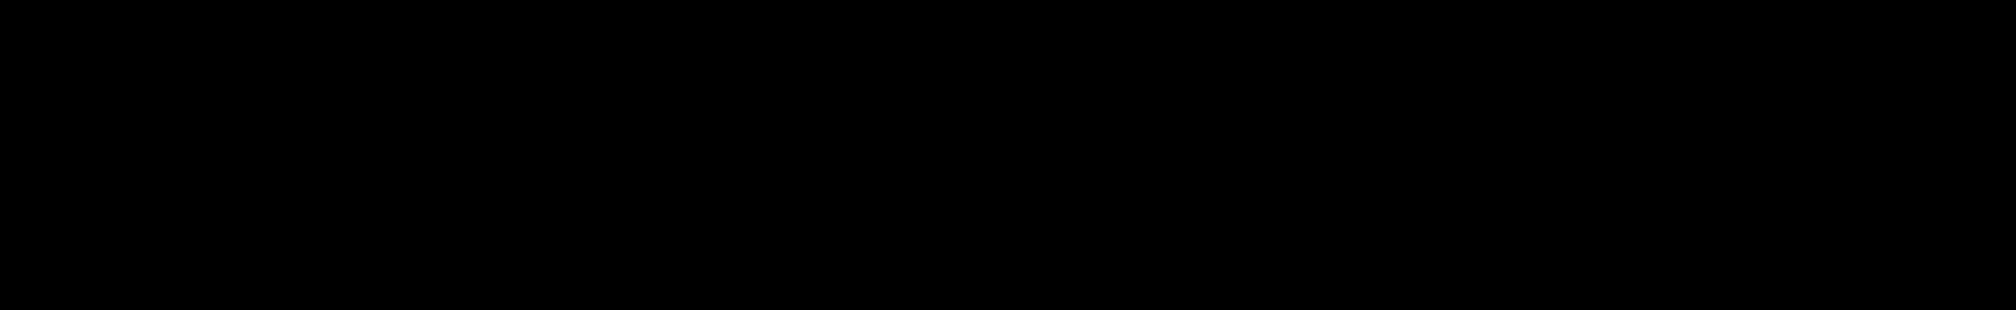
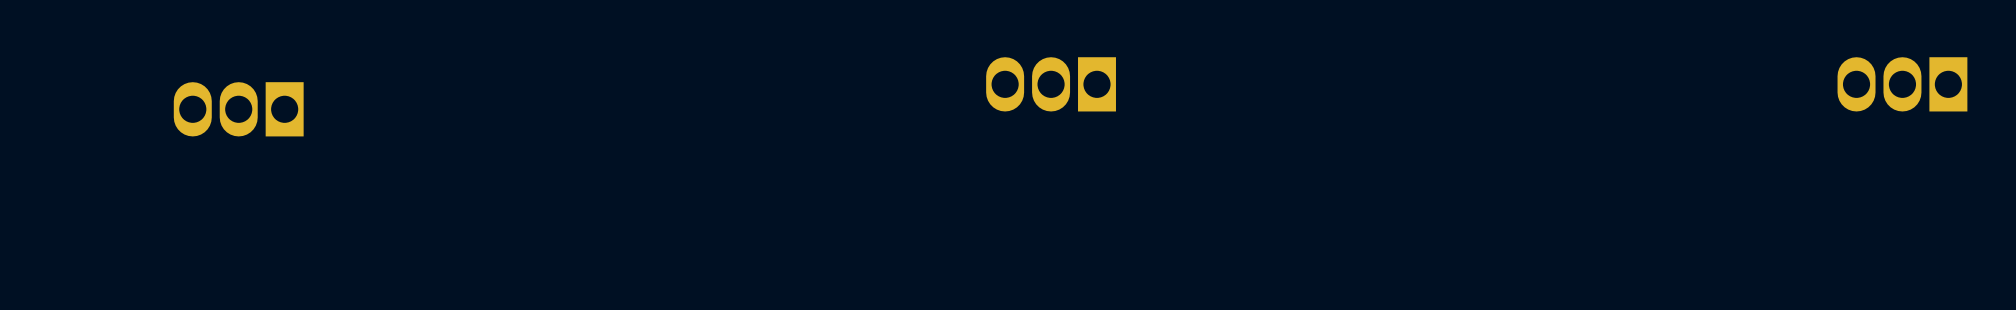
part: none -> (1051, 84)
part: none -> (1902, 84)
part: none -> (238, 109)

